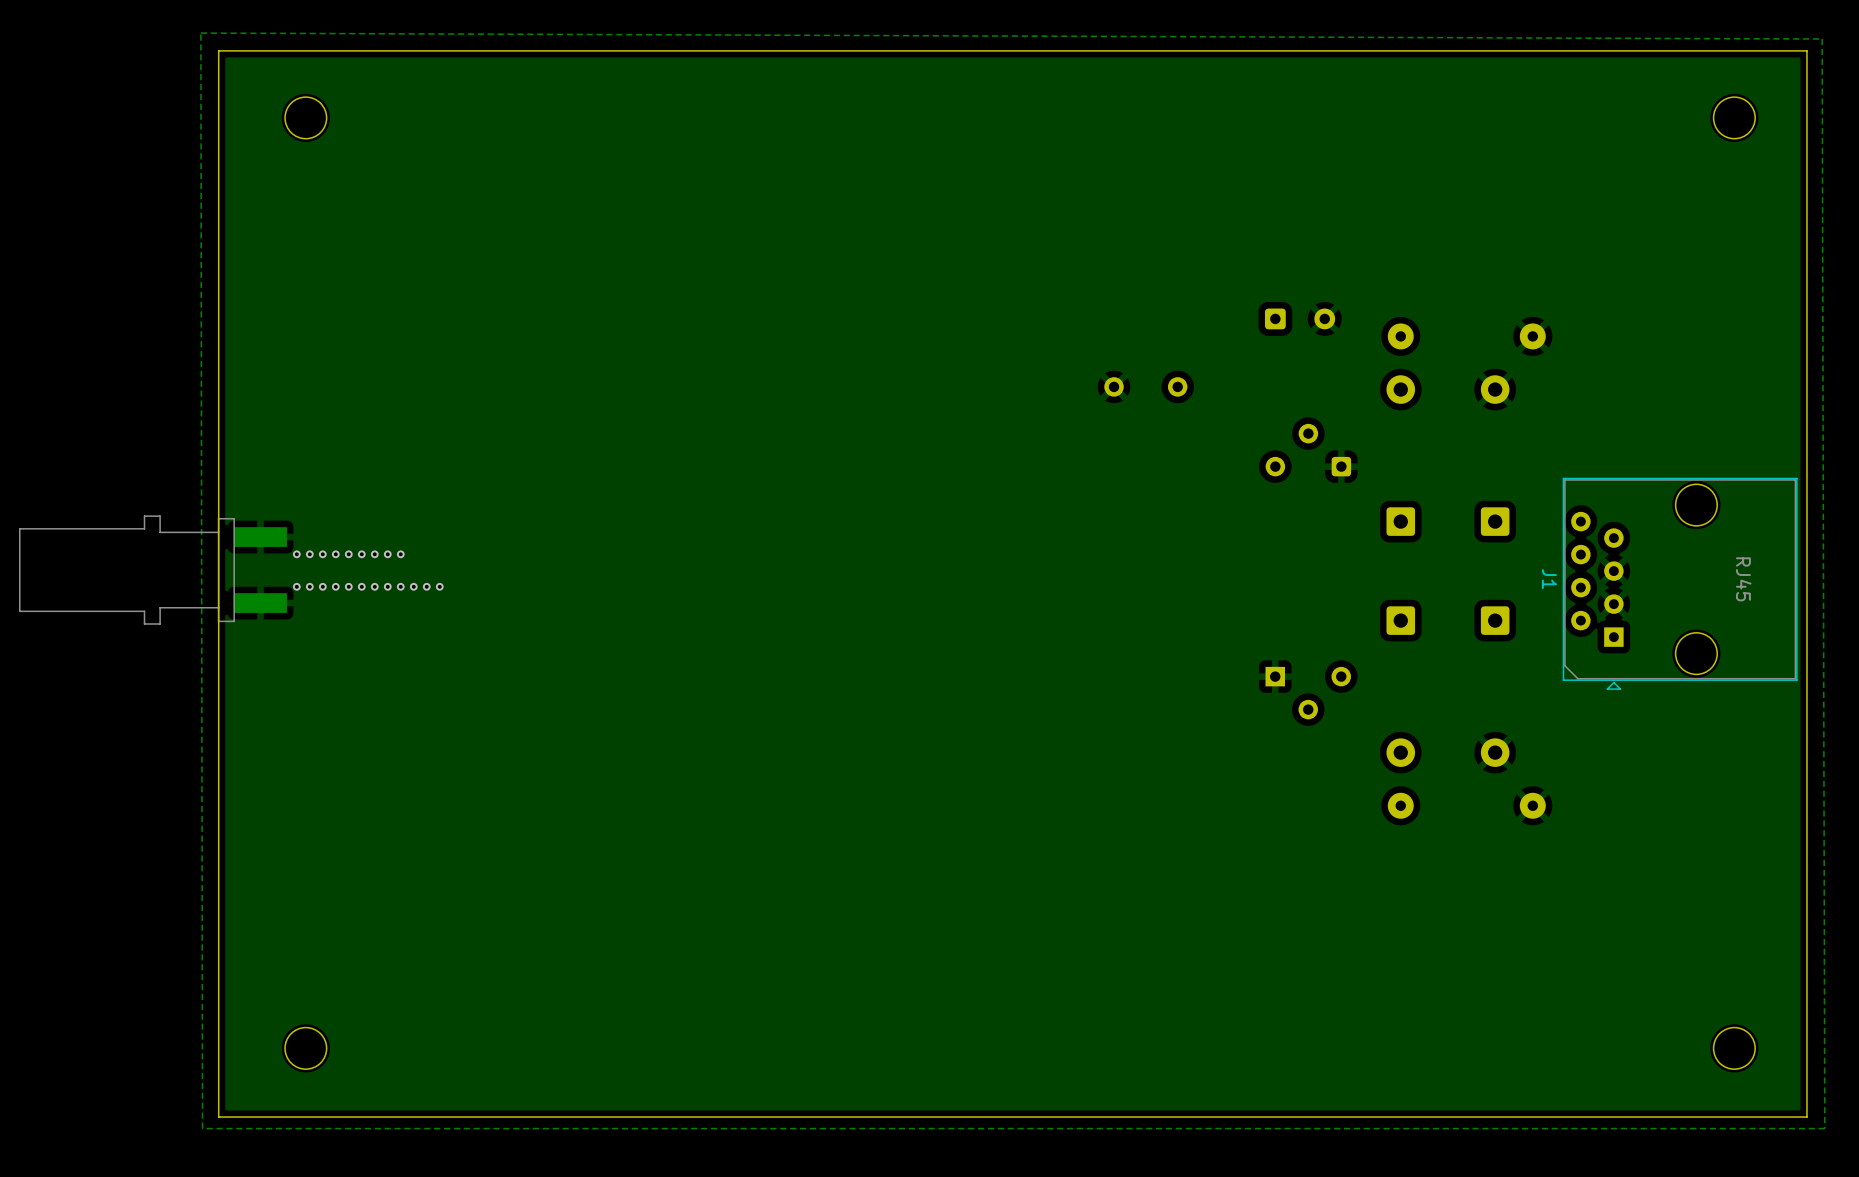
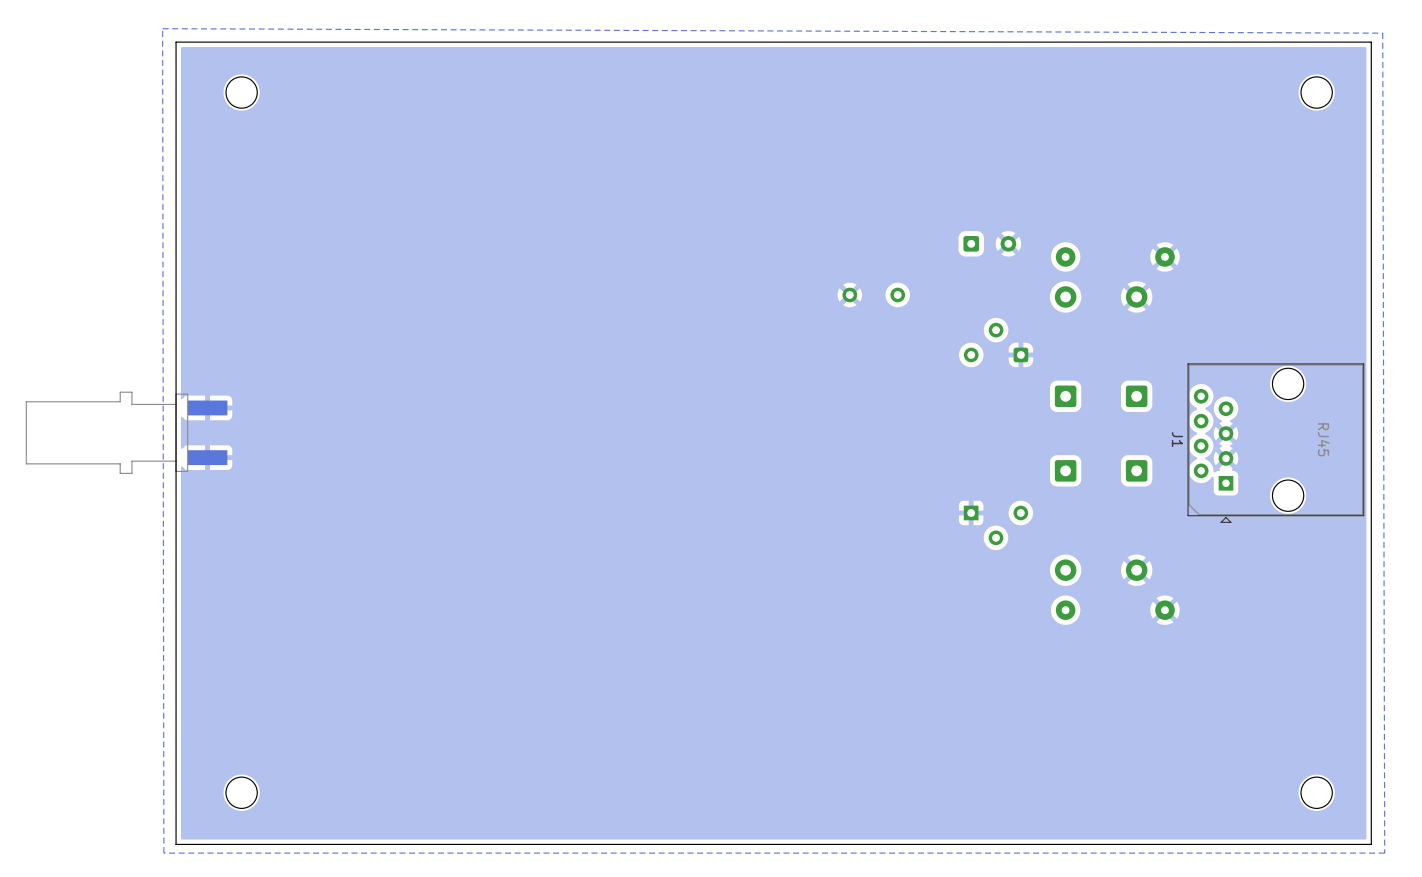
via: (296, 554) -> none
via: (309, 554) -> none
via: (322, 554) -> none
via: (335, 554) -> none
via: (348, 554) -> none
via: (361, 554) -> none
via: (374, 554) -> none
via: (387, 554) -> none
via: (400, 554) -> none
via: (296, 586) -> none
via: (309, 586) -> none
via: (322, 586) -> none
via: (335, 586) -> none
via: (348, 586) -> none
via: (361, 586) -> none
via: (374, 586) -> none
via: (387, 586) -> none
via: (400, 586) -> none
via: (413, 586) -> none
via: (426, 586) -> none
via: (439, 586) -> none

